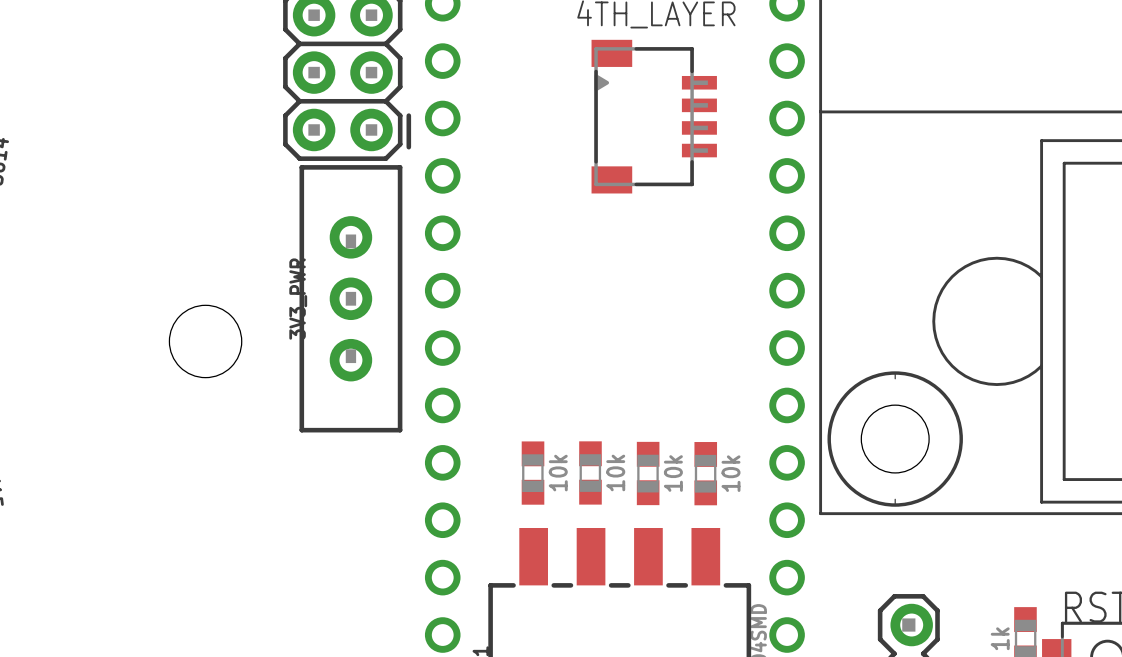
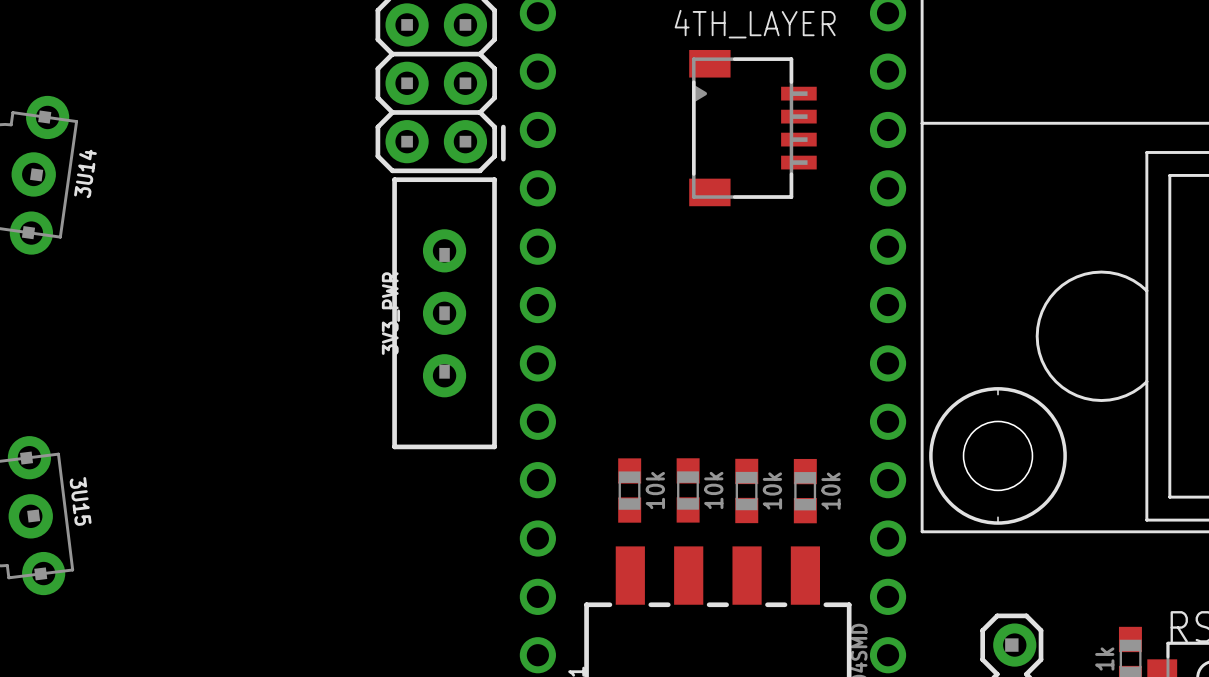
round board edge: [169, 305, 242, 378] -> none

